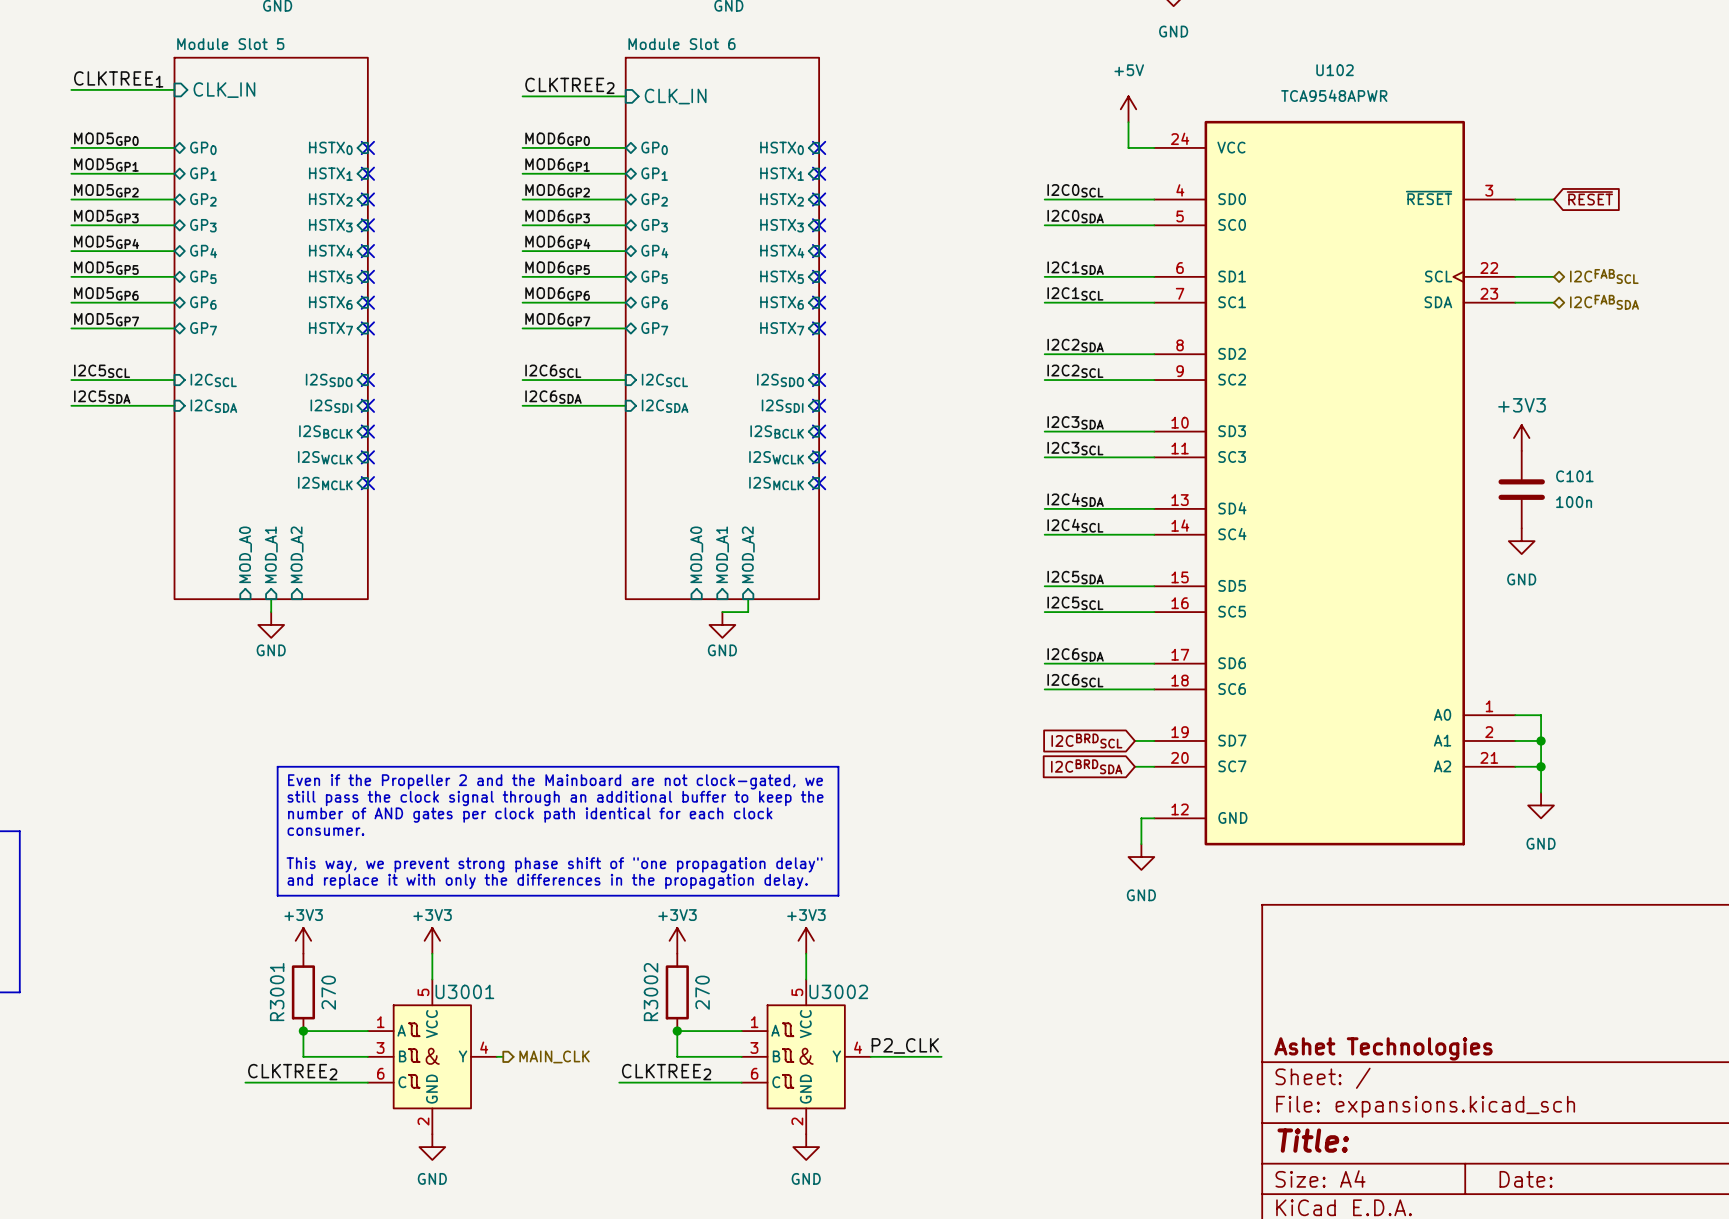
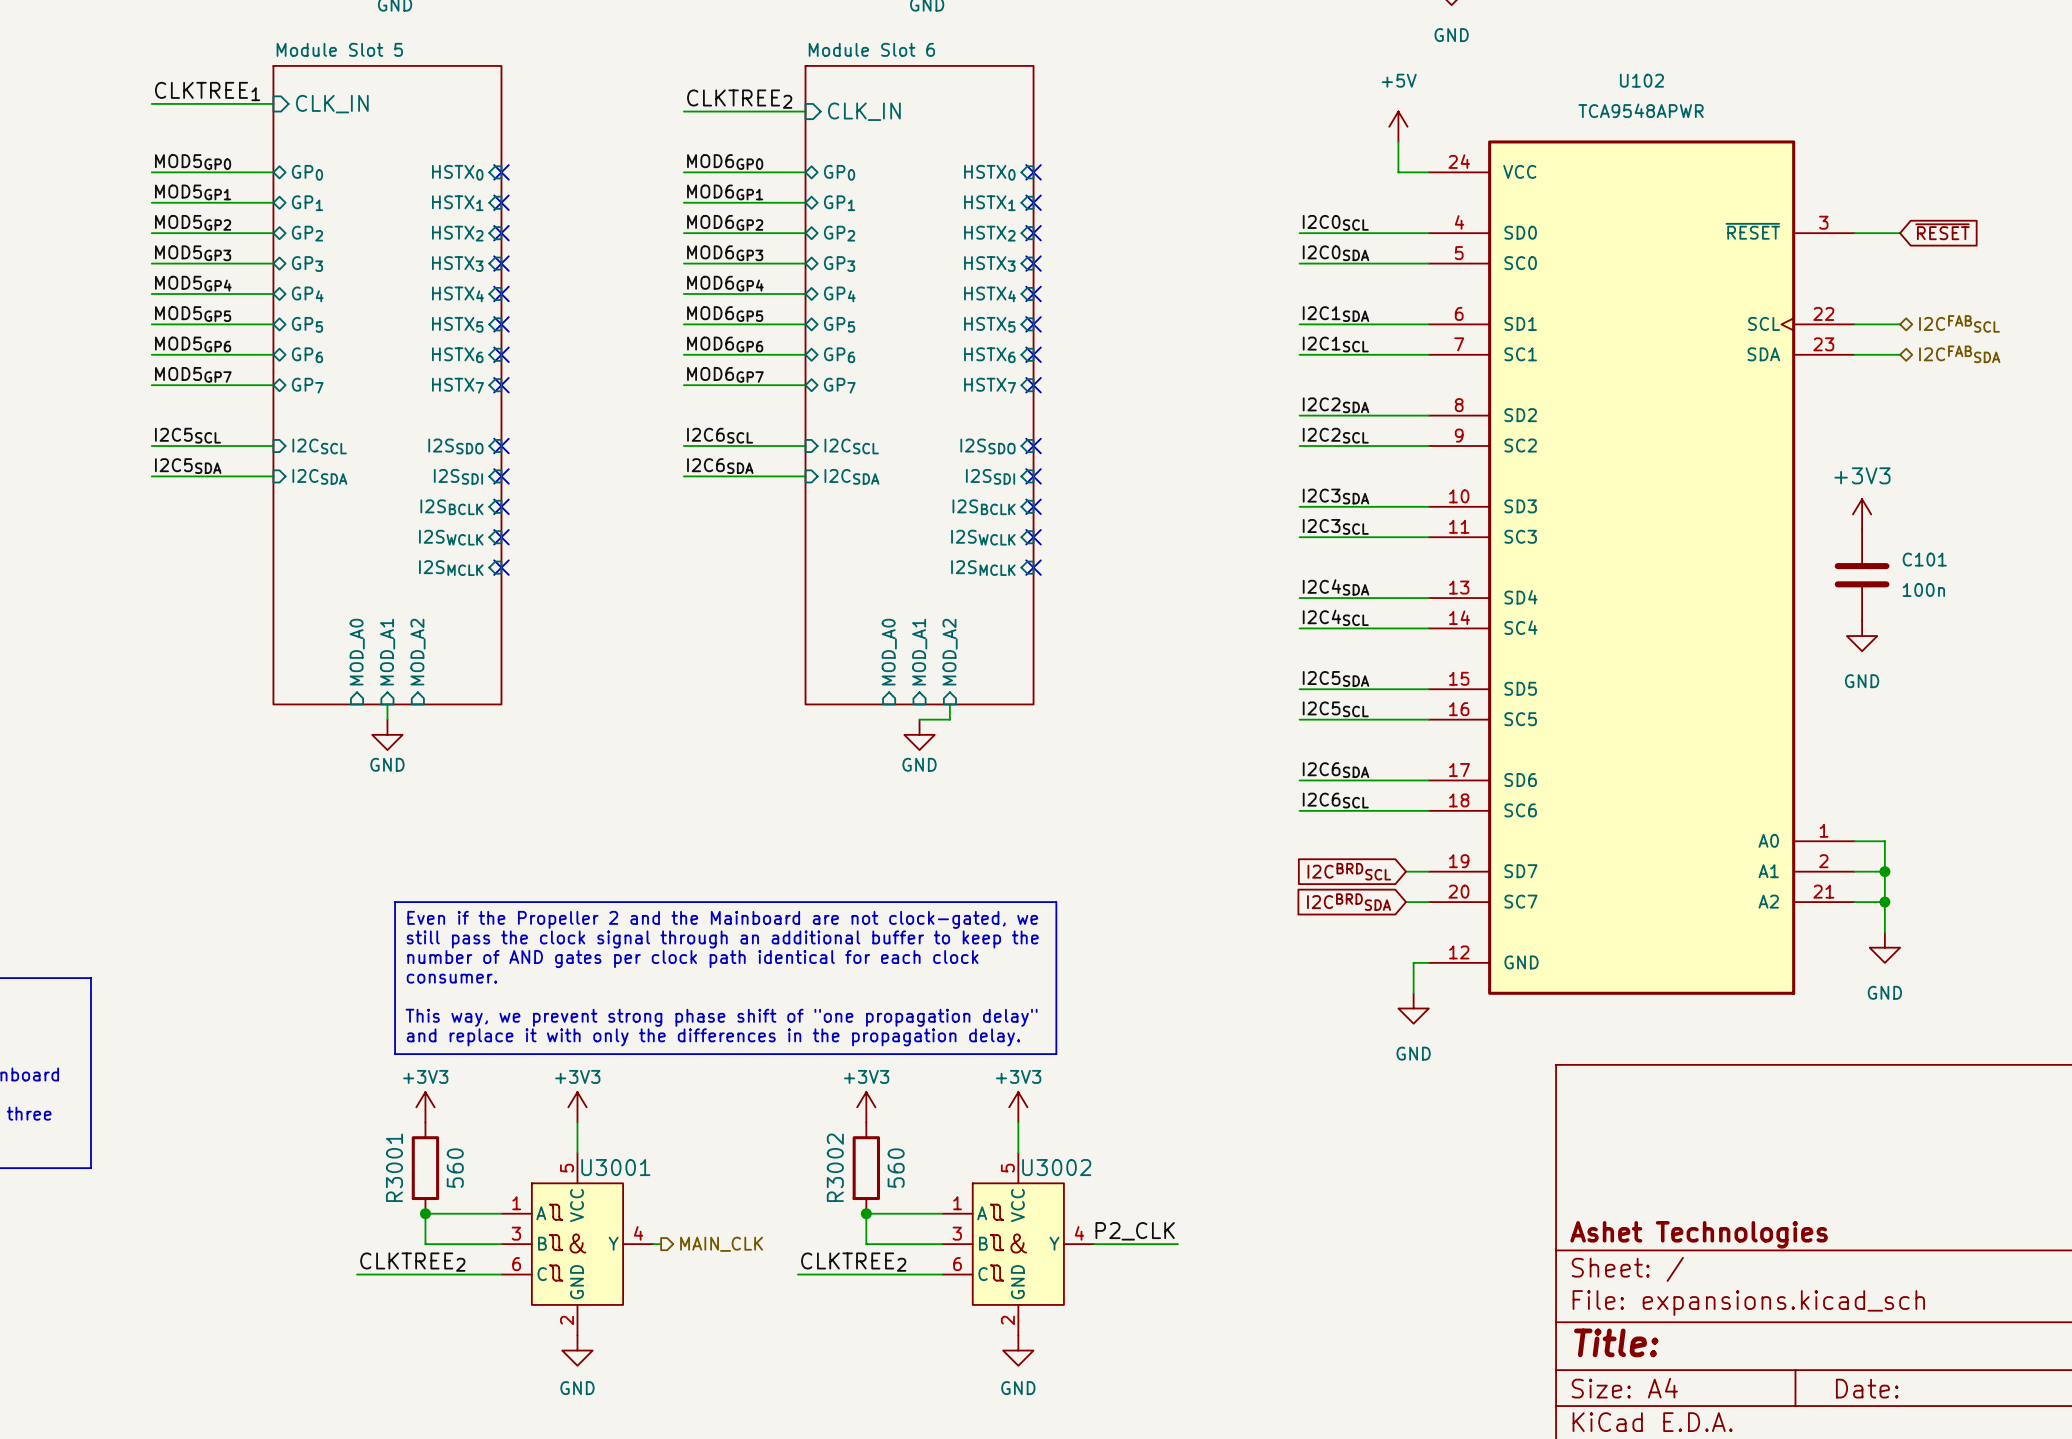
R3001 value: 270 (328, 992) -> 560 (455, 1168)
R3002 value: 270 (702, 992) -> 560 (896, 1168)

